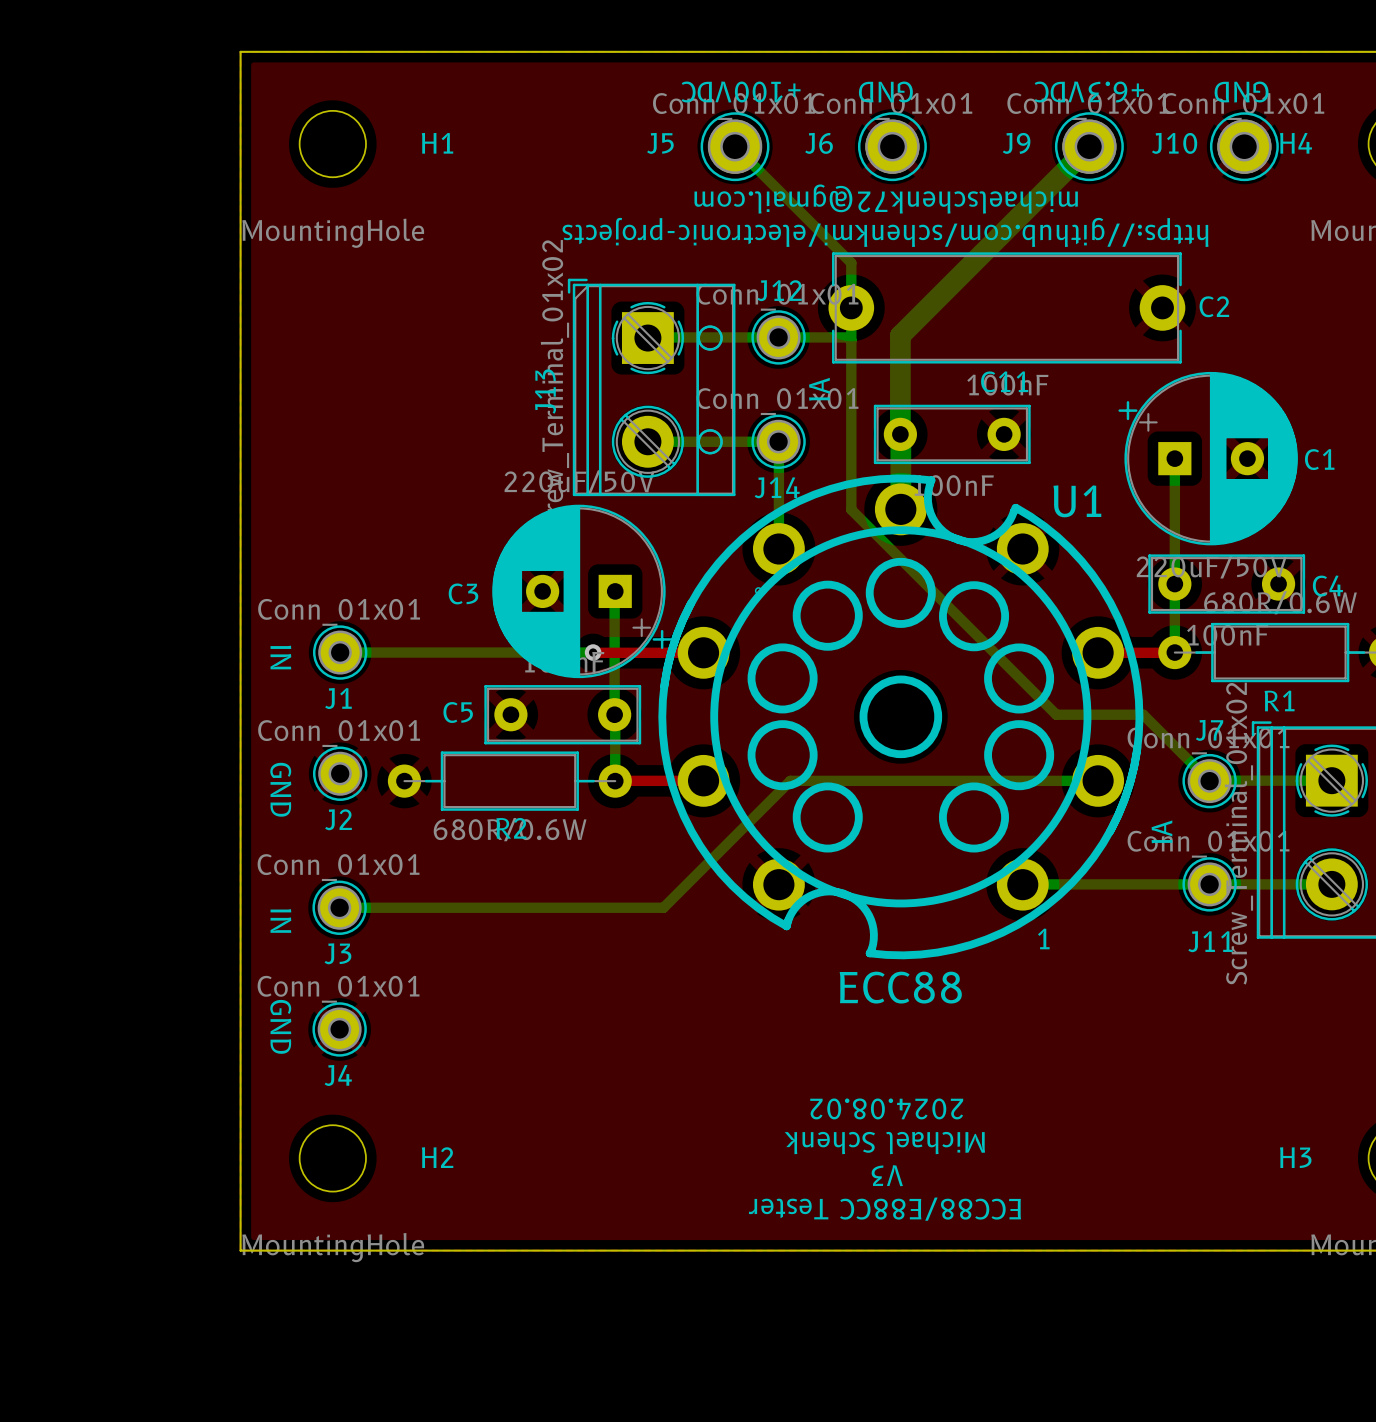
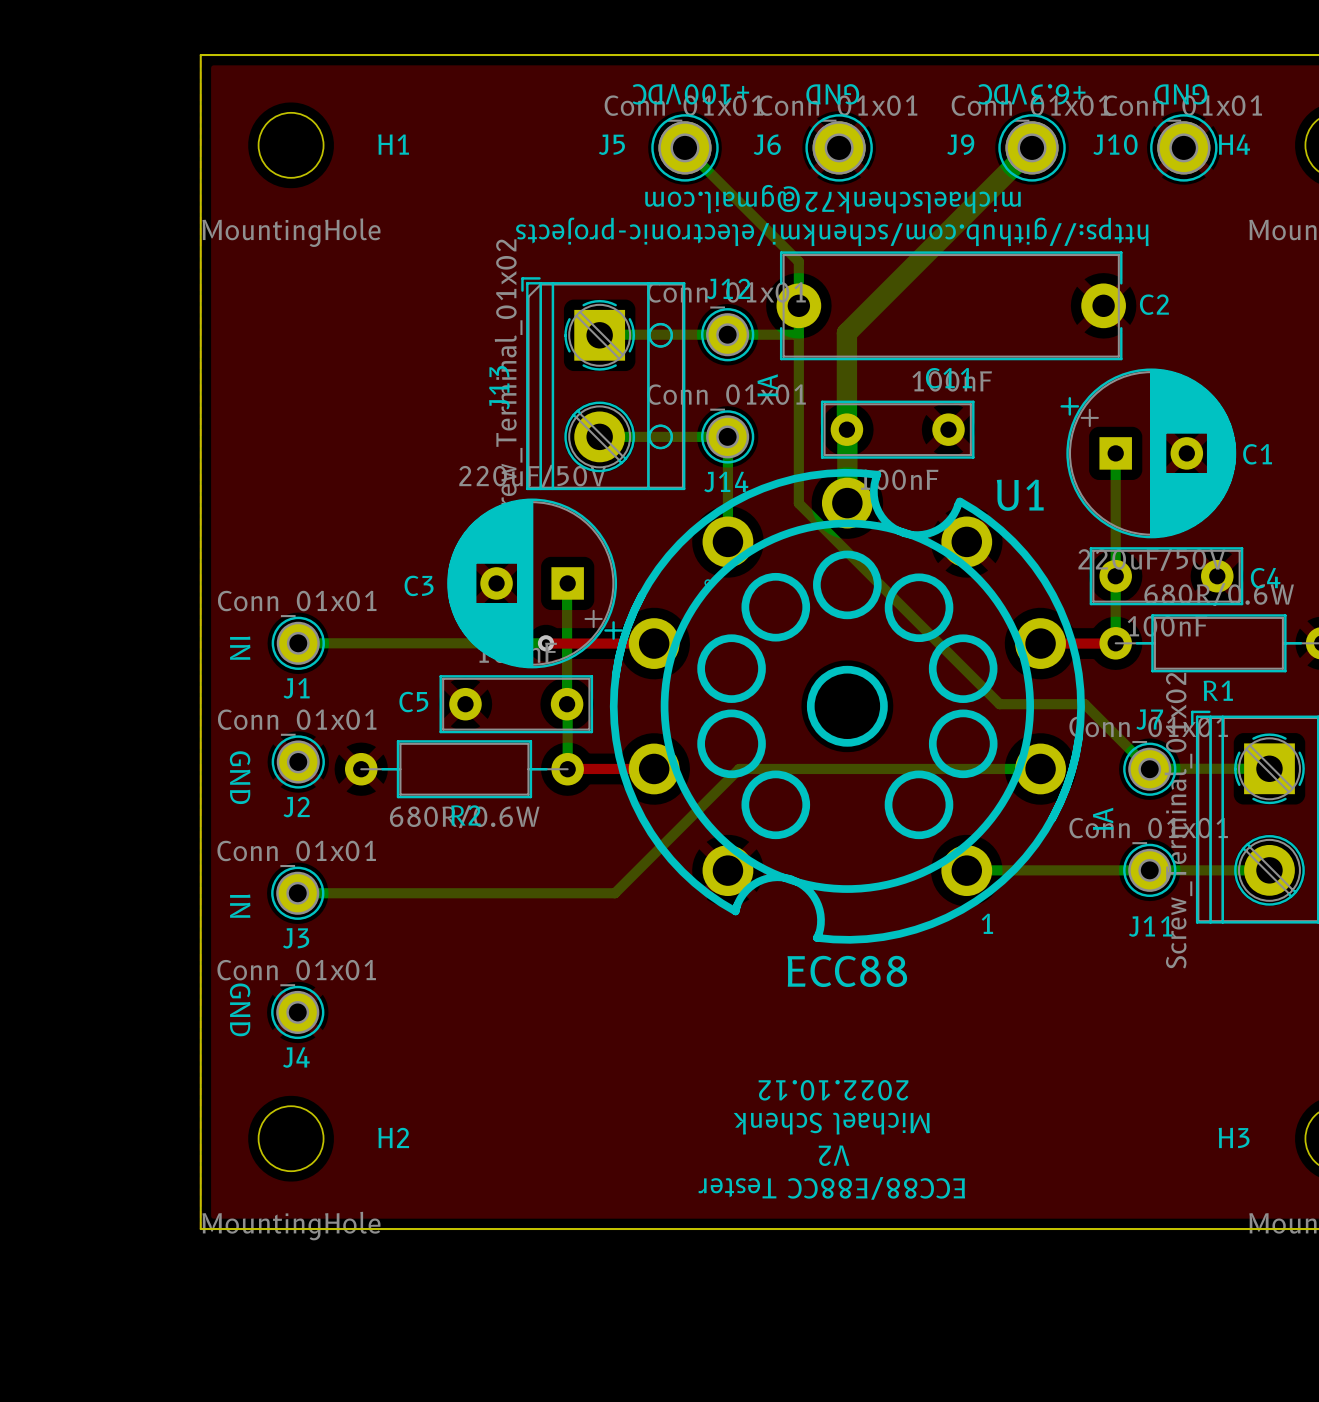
text: 2024.08.02 (886, 1108) -> 2022.10.12 (833, 1090)
text: V3 (887, 1175) -> V2 (834, 1155)

